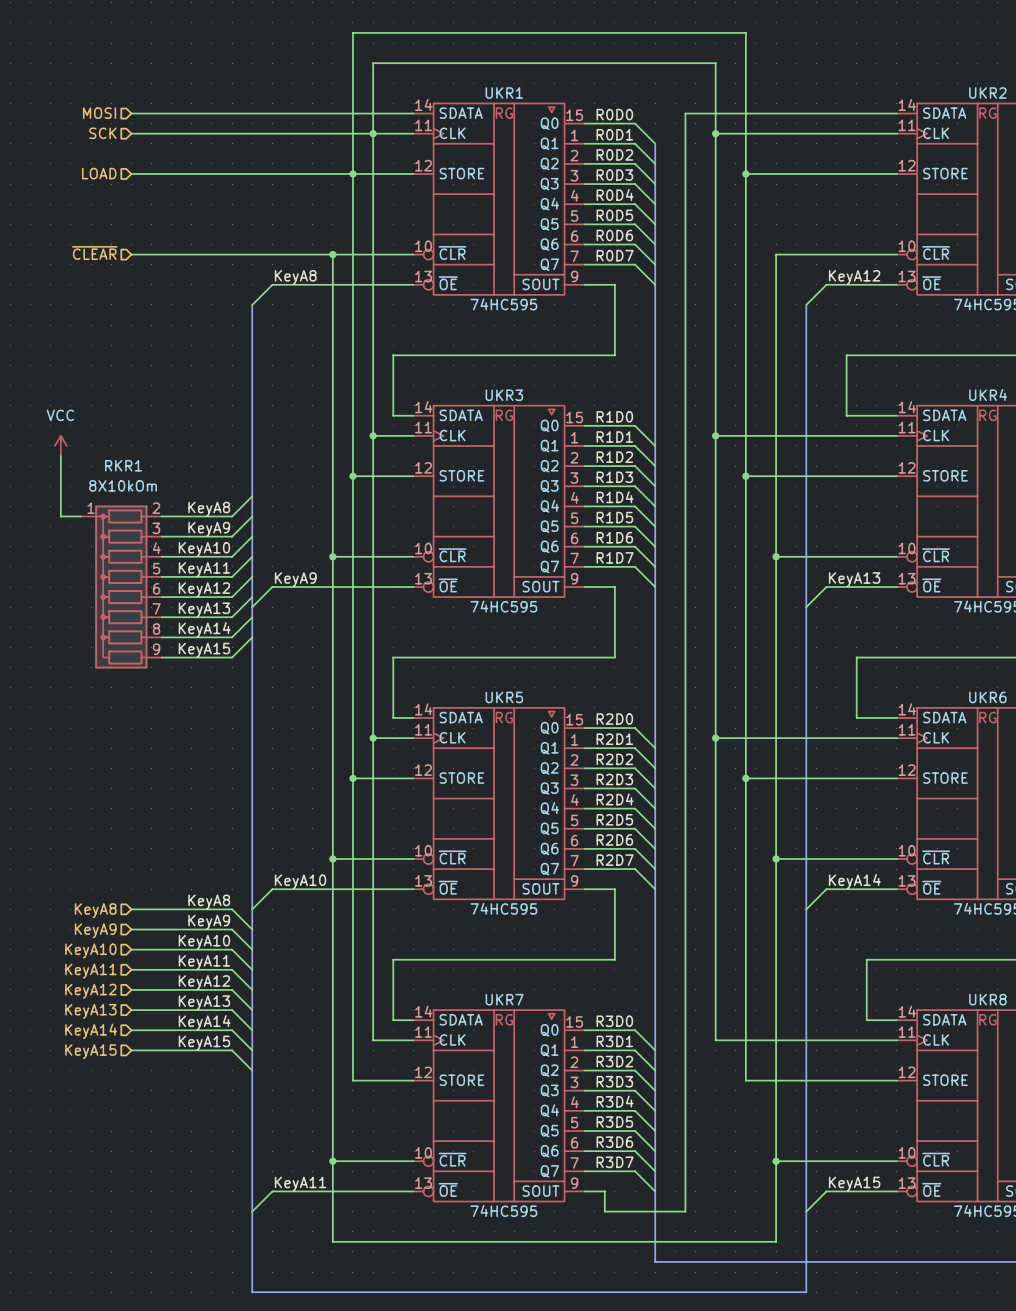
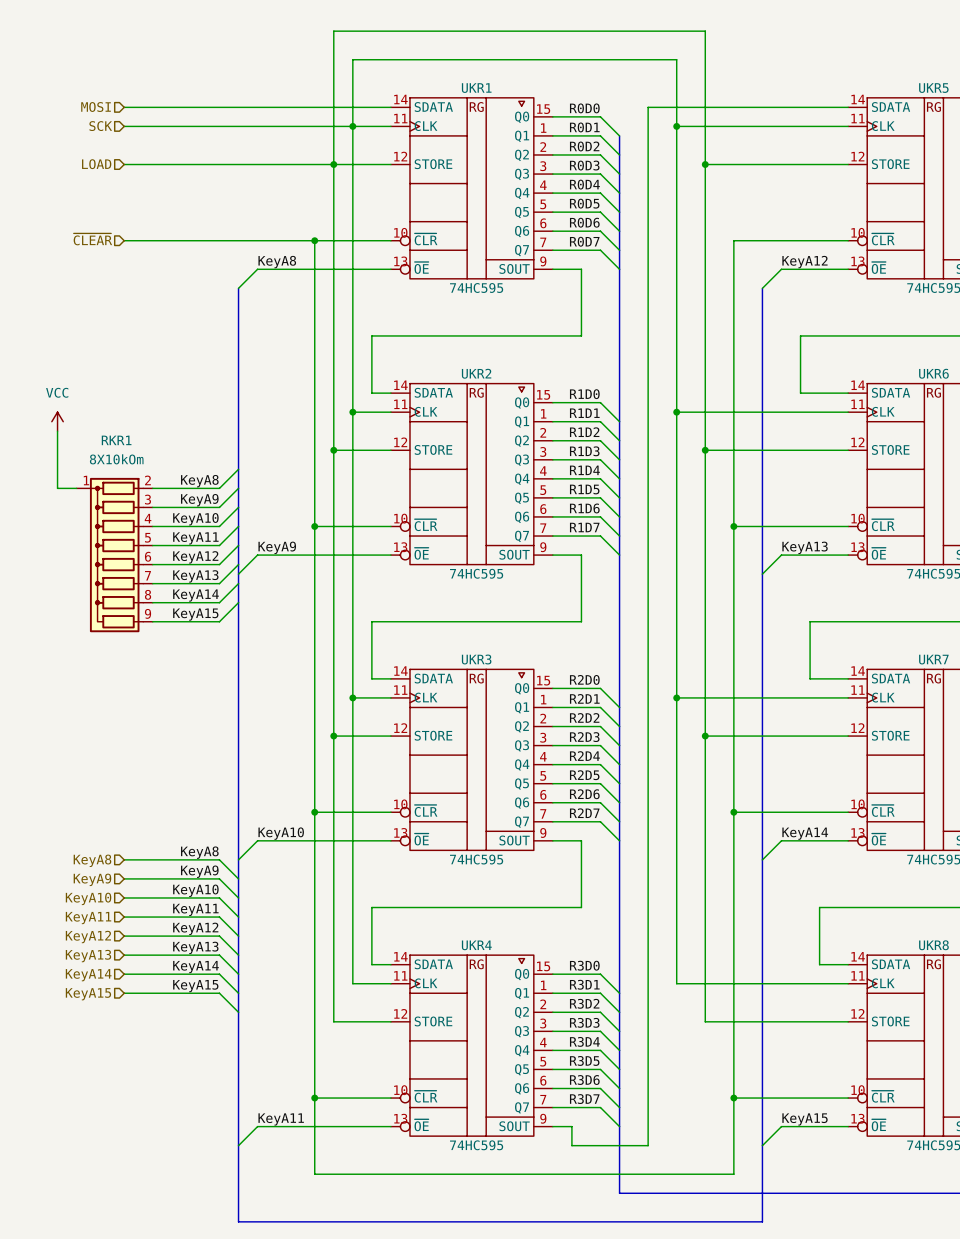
UKR2 name: UKR2 (987, 93) -> UKR5 (933, 88)
UKR4 name: UKR4 (988, 394) -> UKR6 (933, 373)
UKR3 name: UKR3 (504, 395) -> UKR2 (476, 373)
UKR5 name: UKR5 (504, 697) -> UKR3 (476, 659)
UKR6 name: UKR6 (987, 697) -> UKR7 (933, 659)
UKR7 name: UKR7 (504, 999) -> UKR4 (476, 945)

